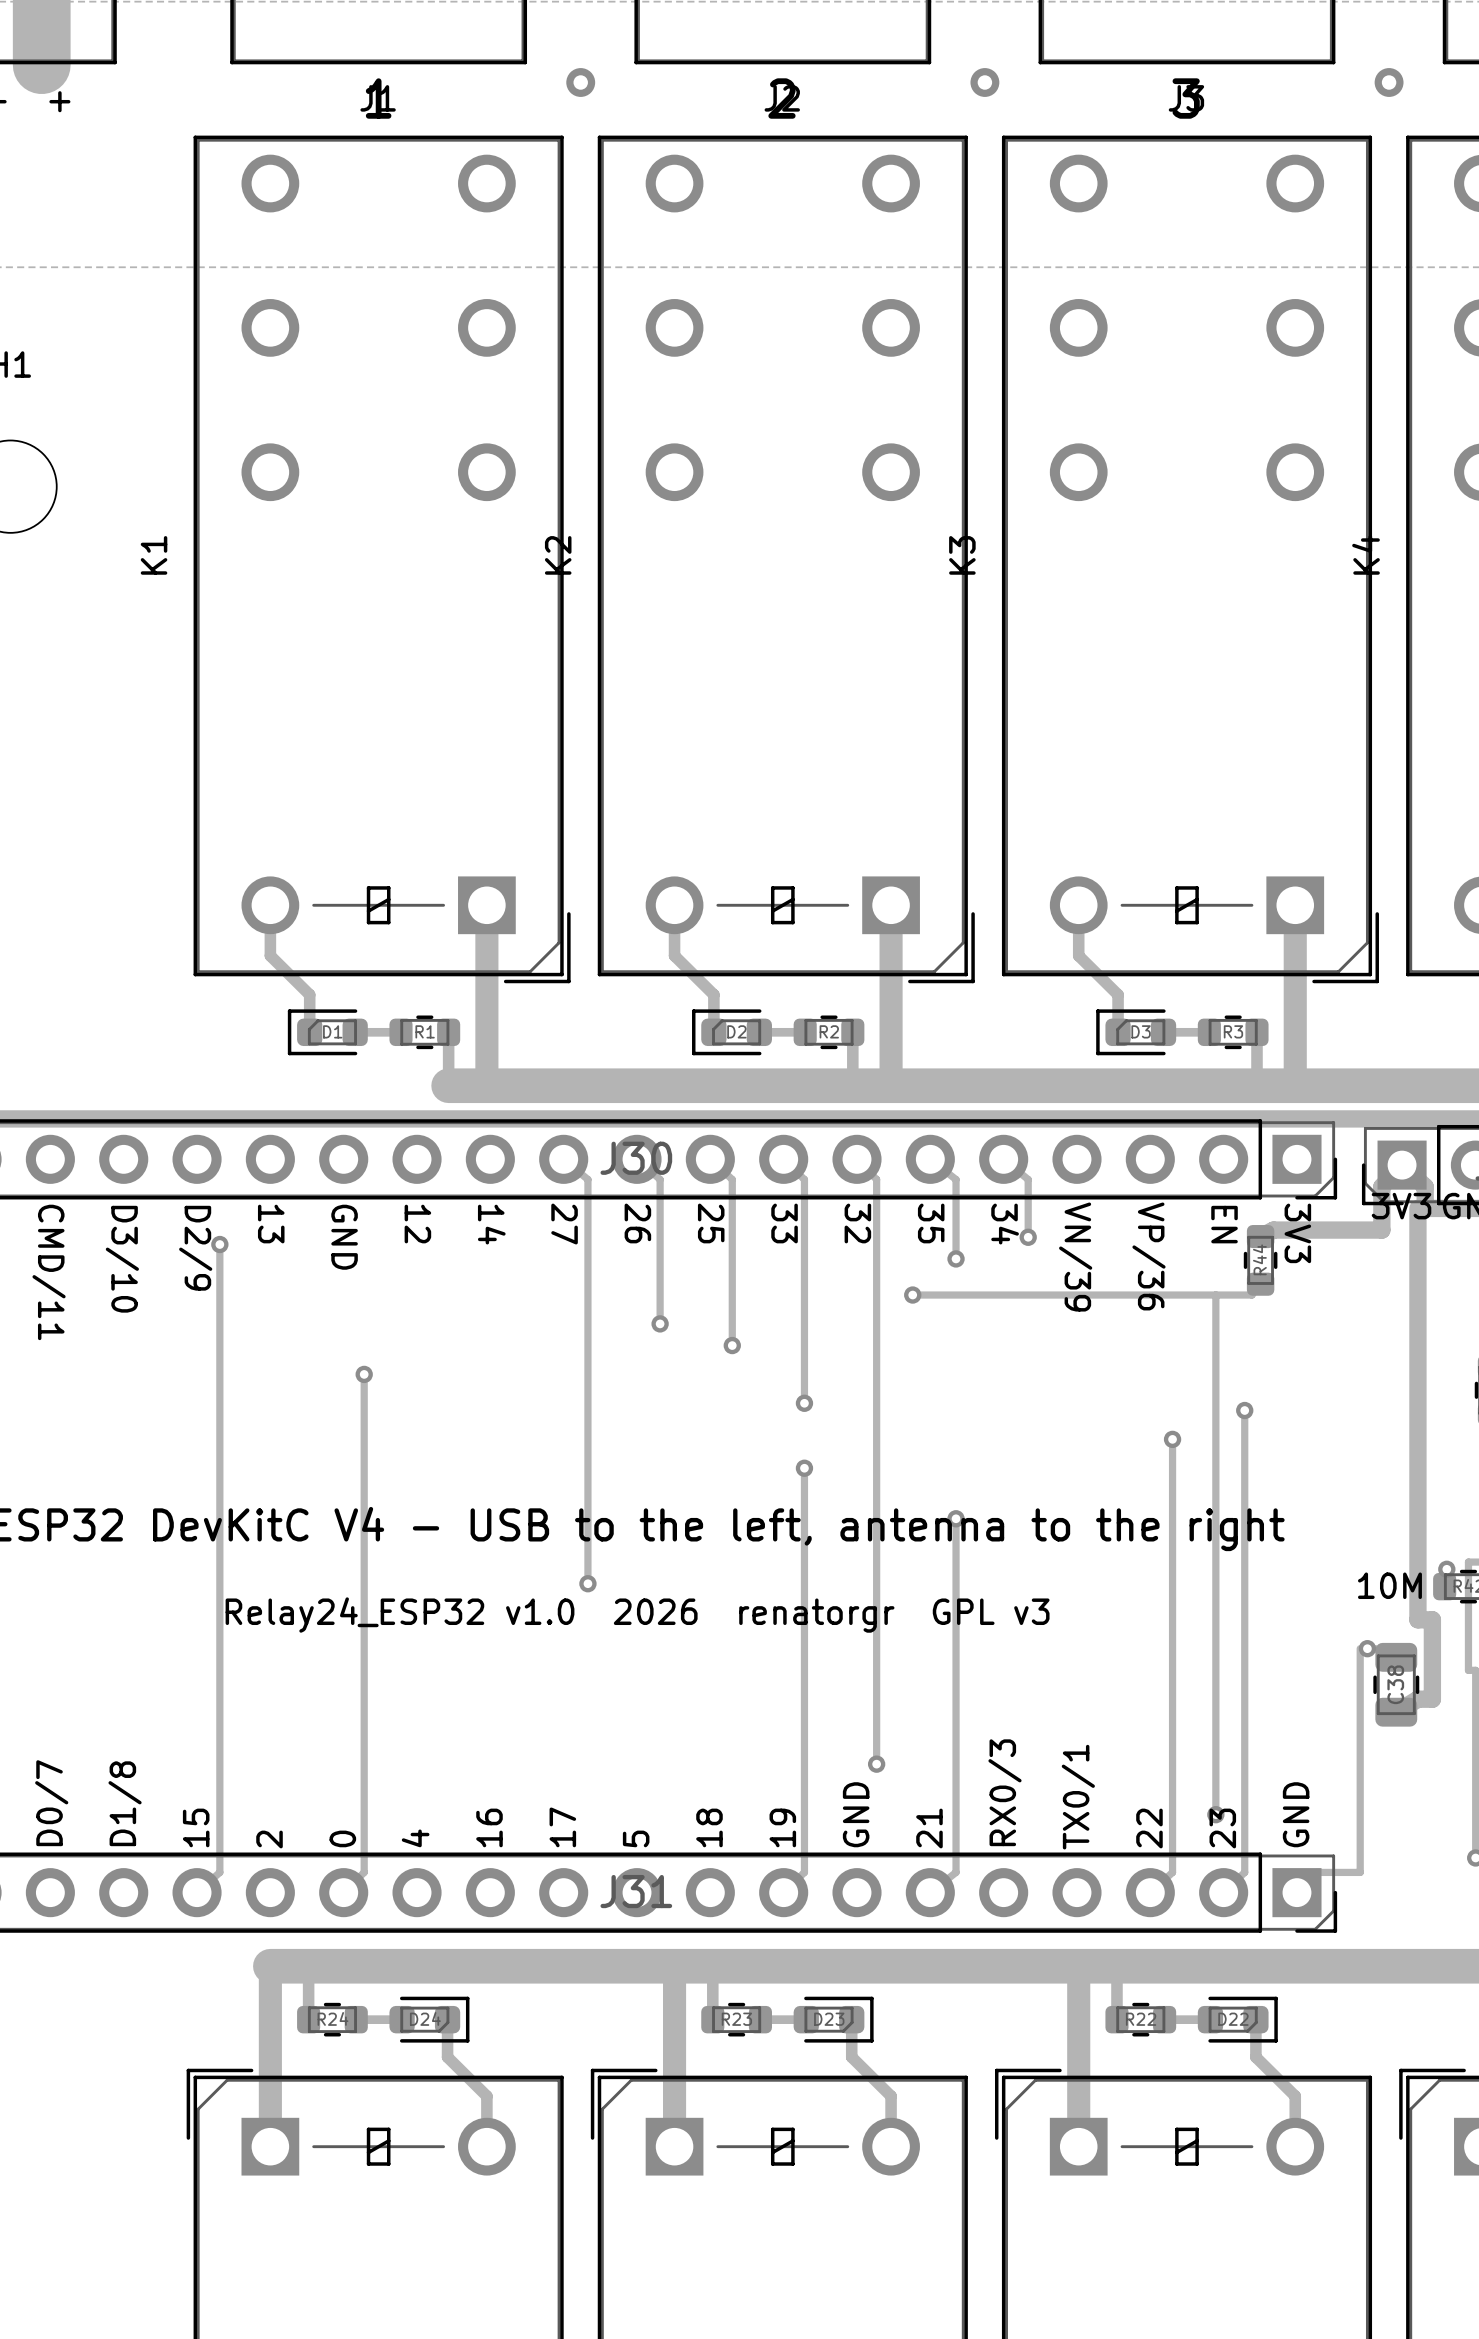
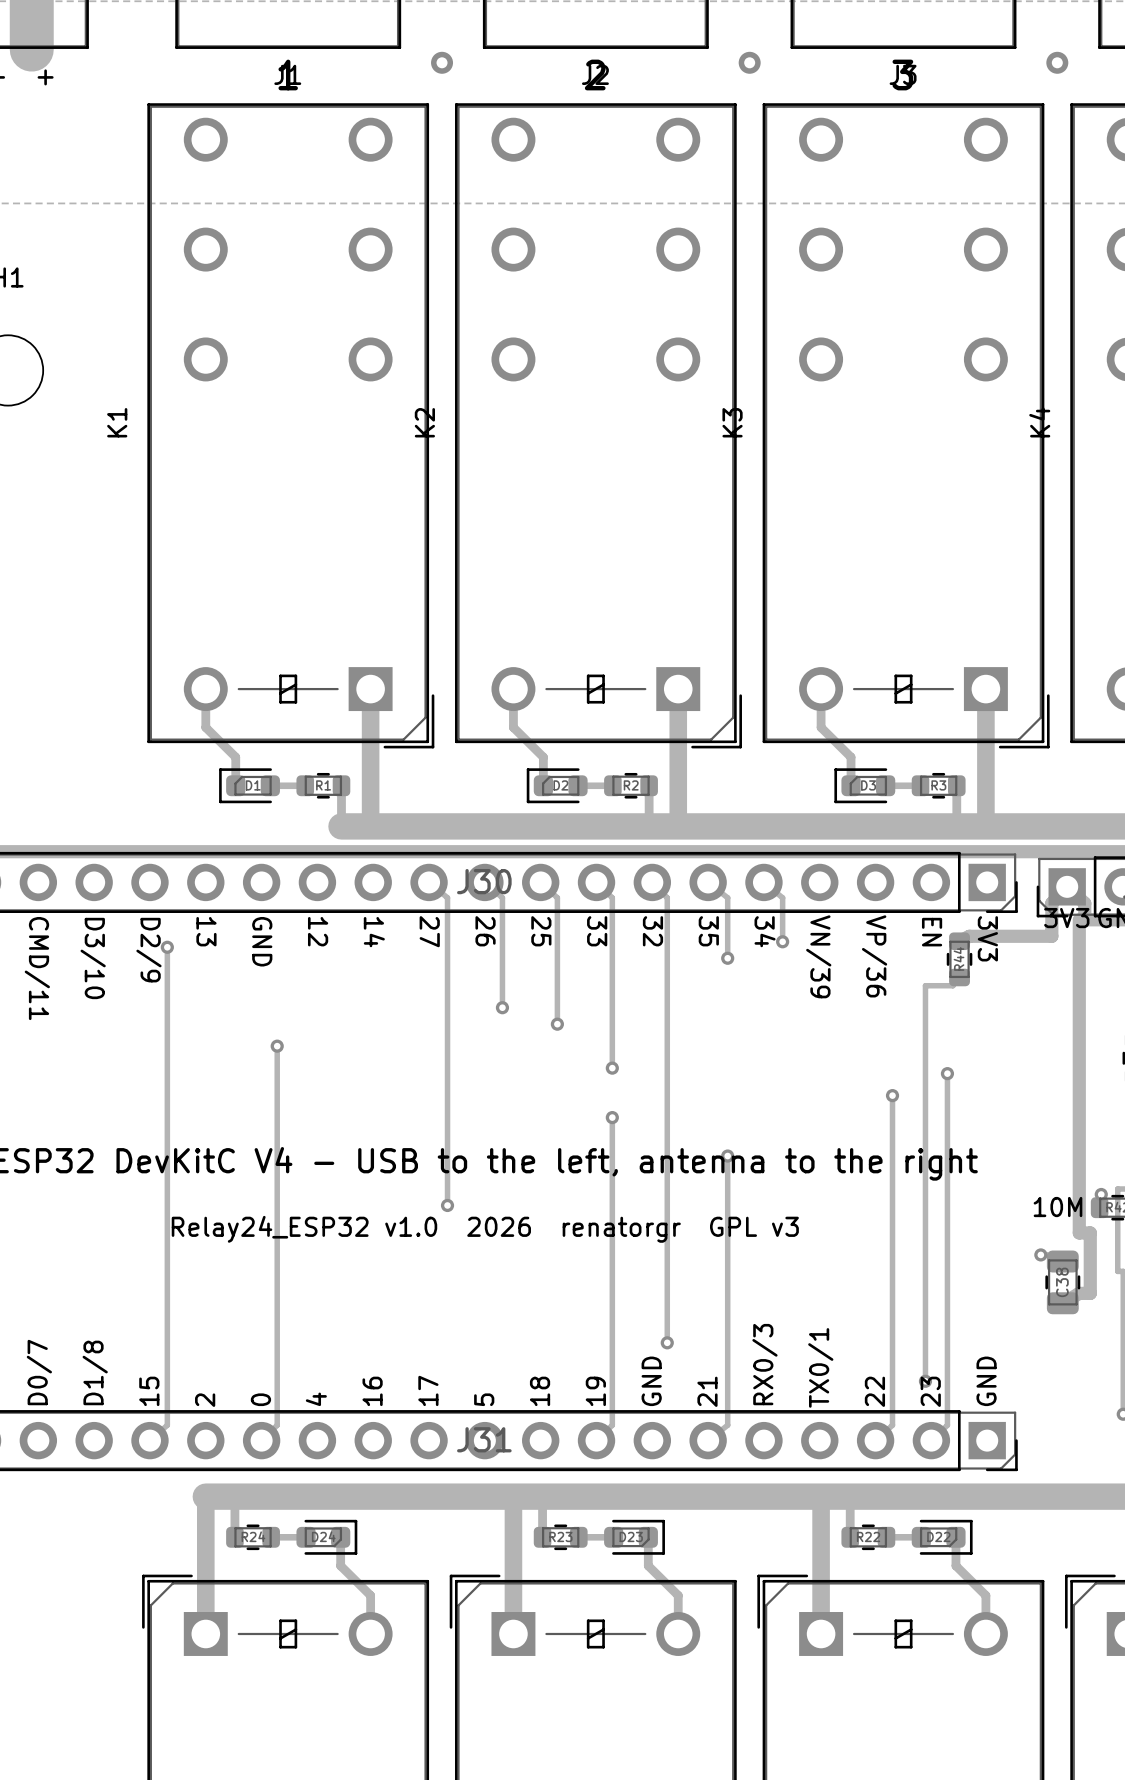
track: (912, 1295) (1215, 1295) -> none
via: (912, 1295) -> none
track: (1360, 1648) (1360, 1872) (1316, 1872) (1296, 1892) -> none

